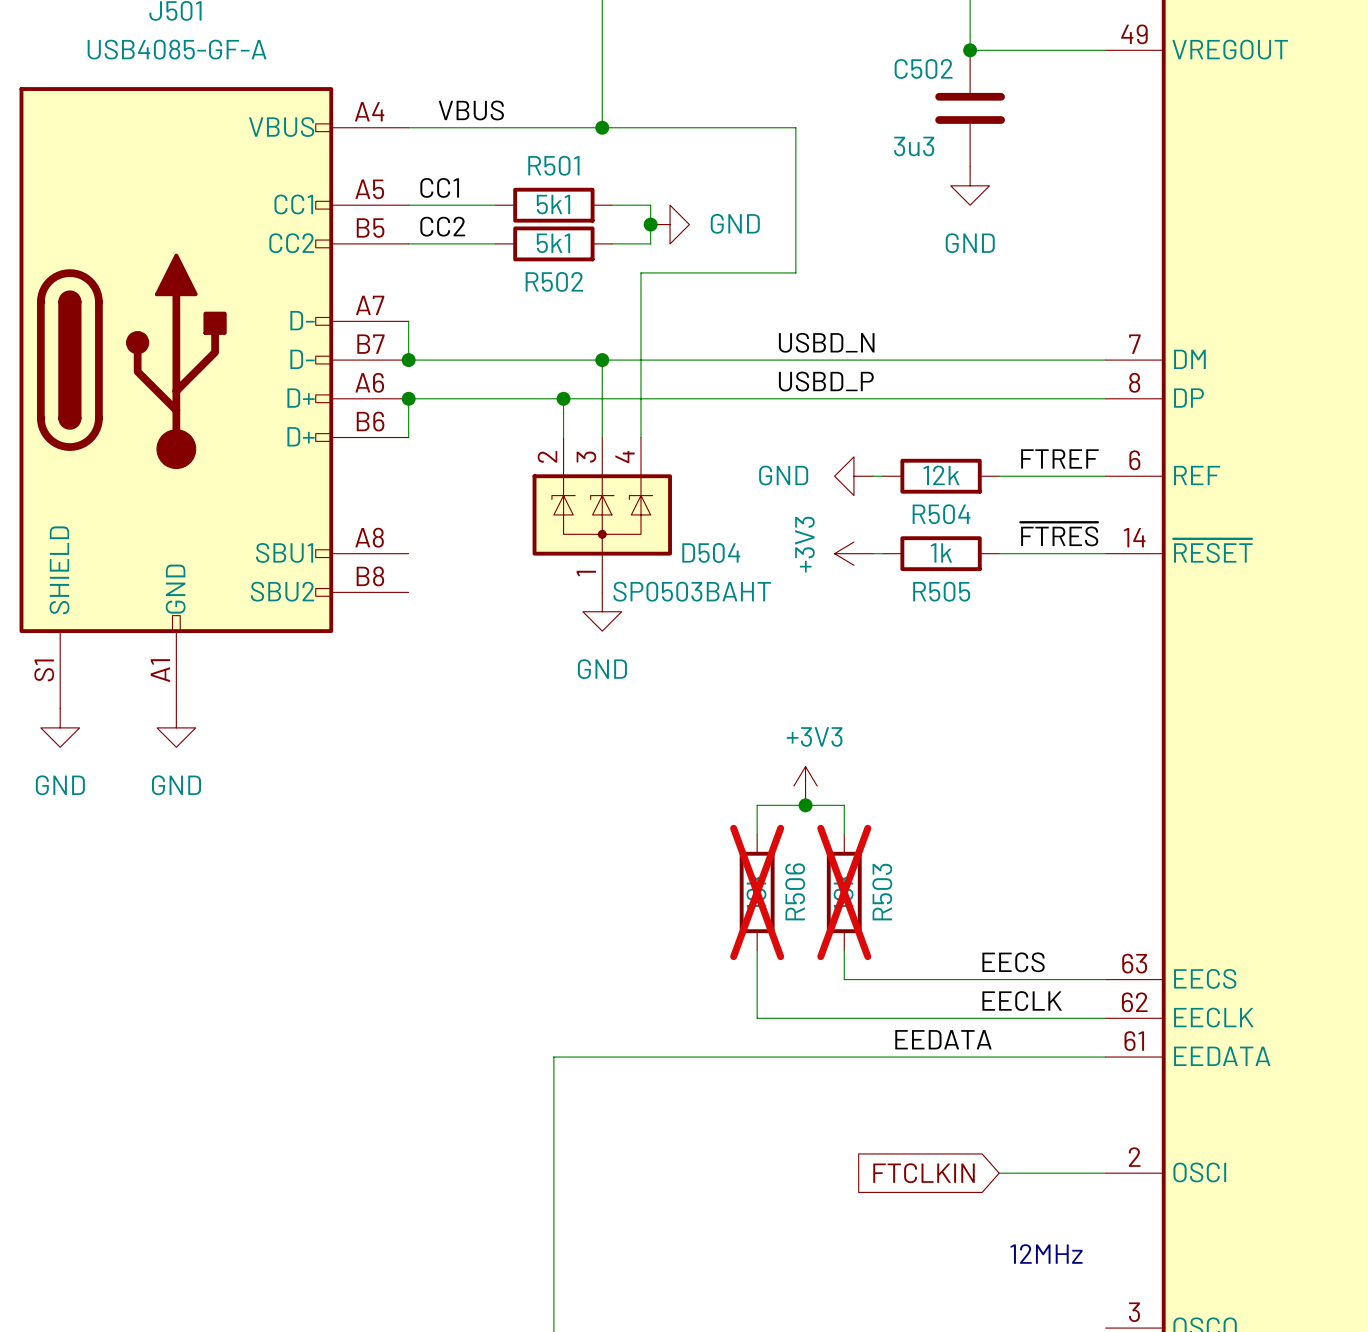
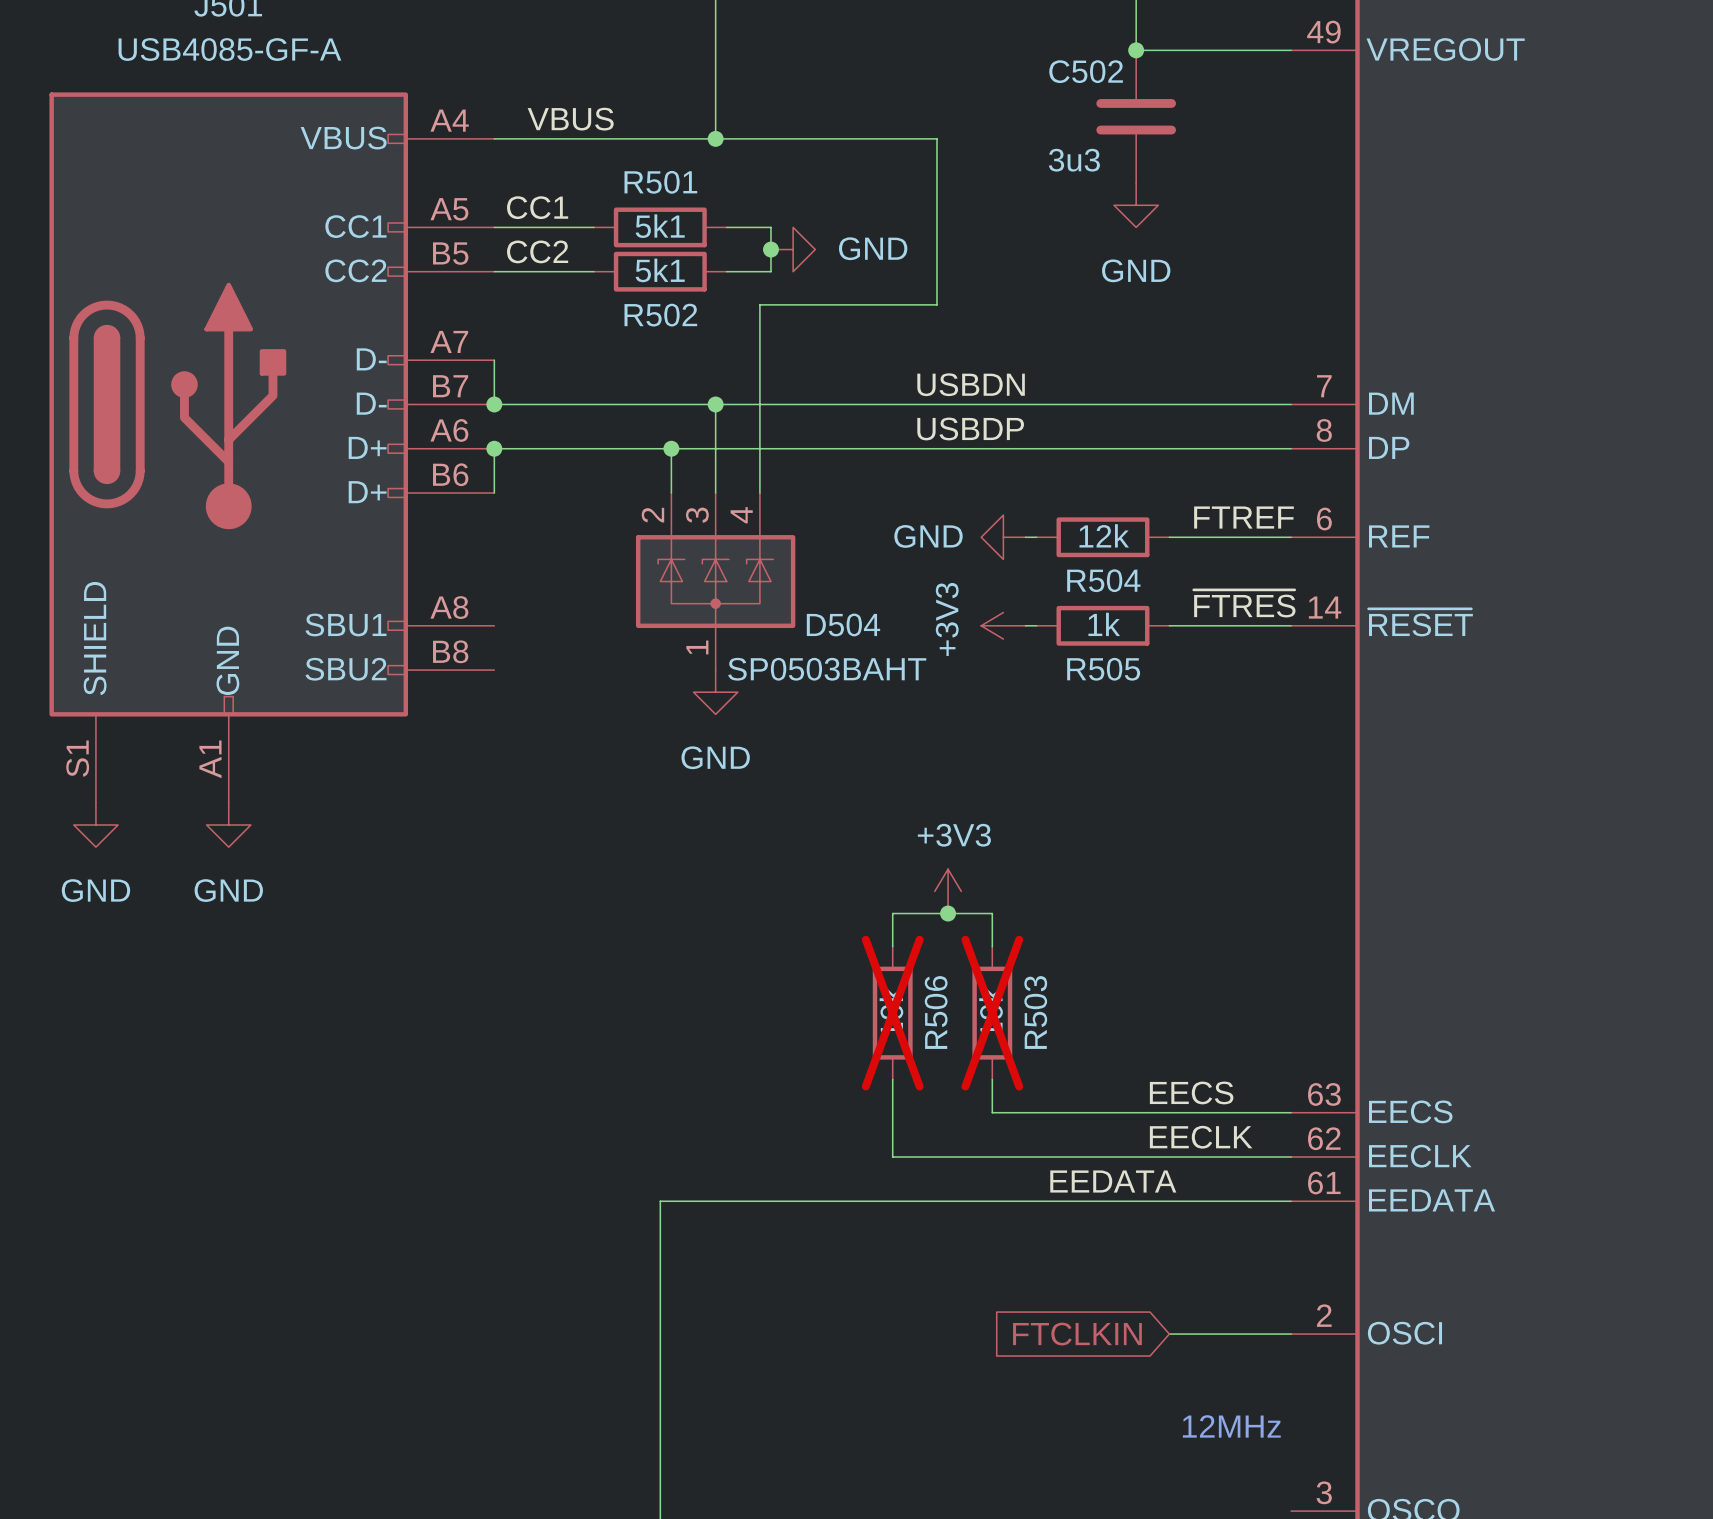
label: USBD_N (826, 342) -> USBDN (971, 384)
label: USBD_P (826, 381) -> USBDP (970, 428)

